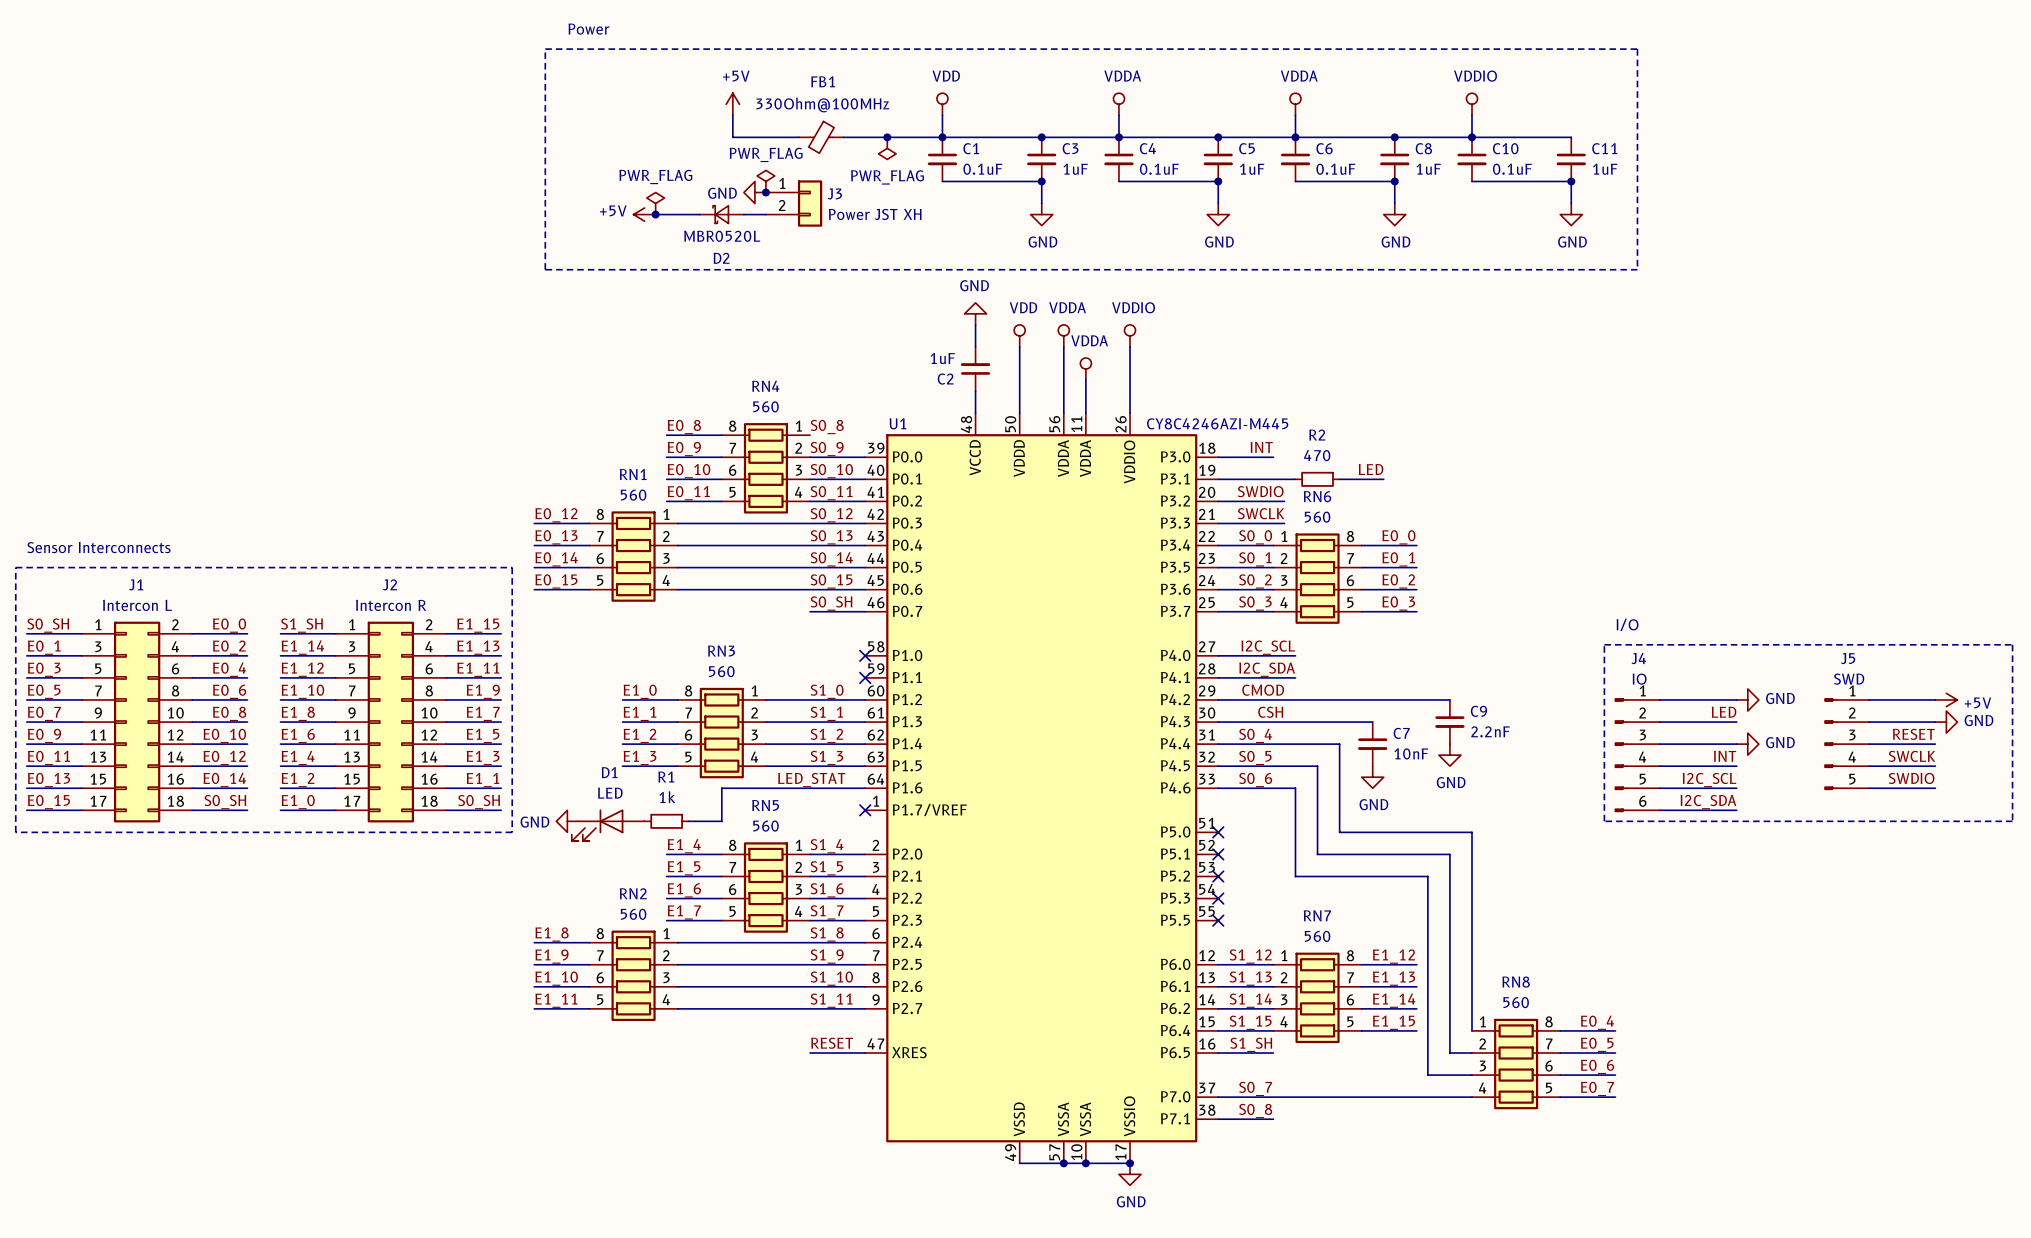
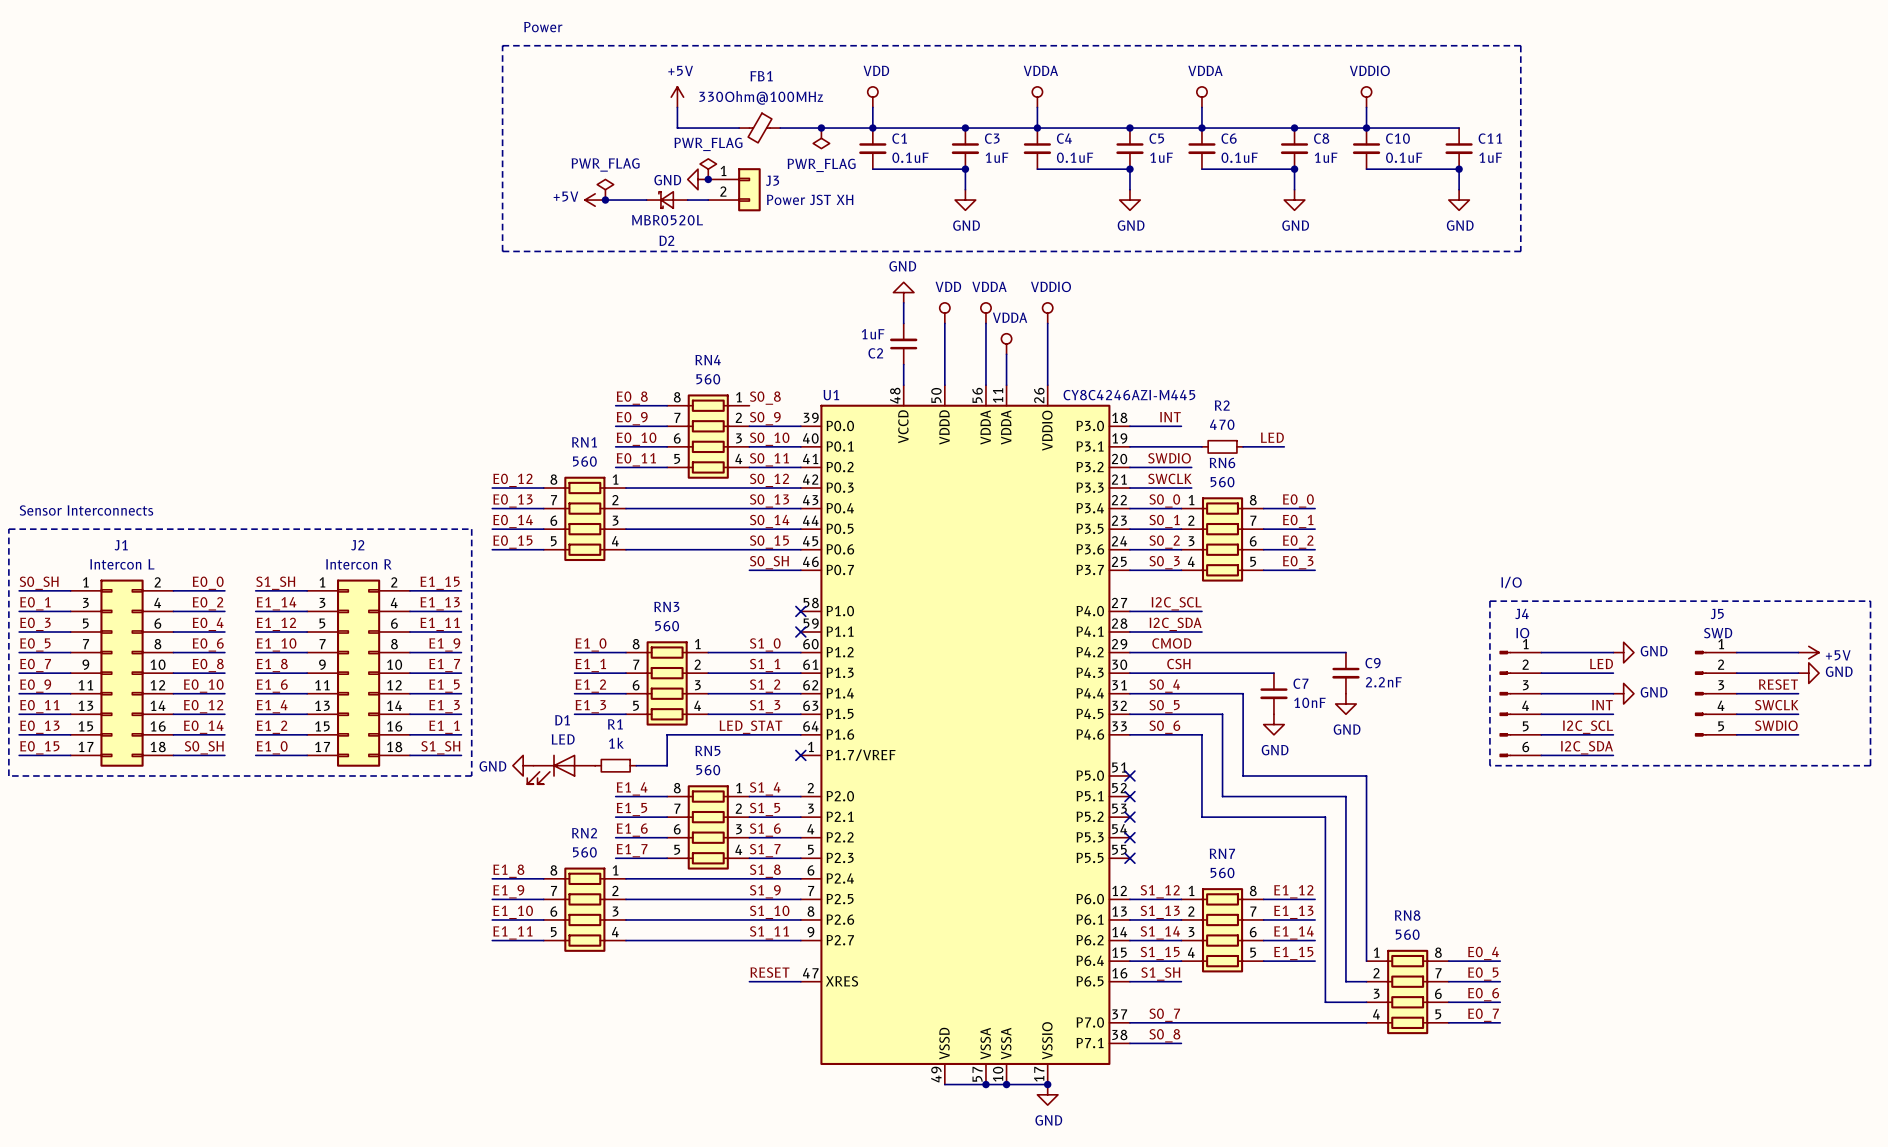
label: S0_SH (479, 802) -> S1_SH (440, 747)

